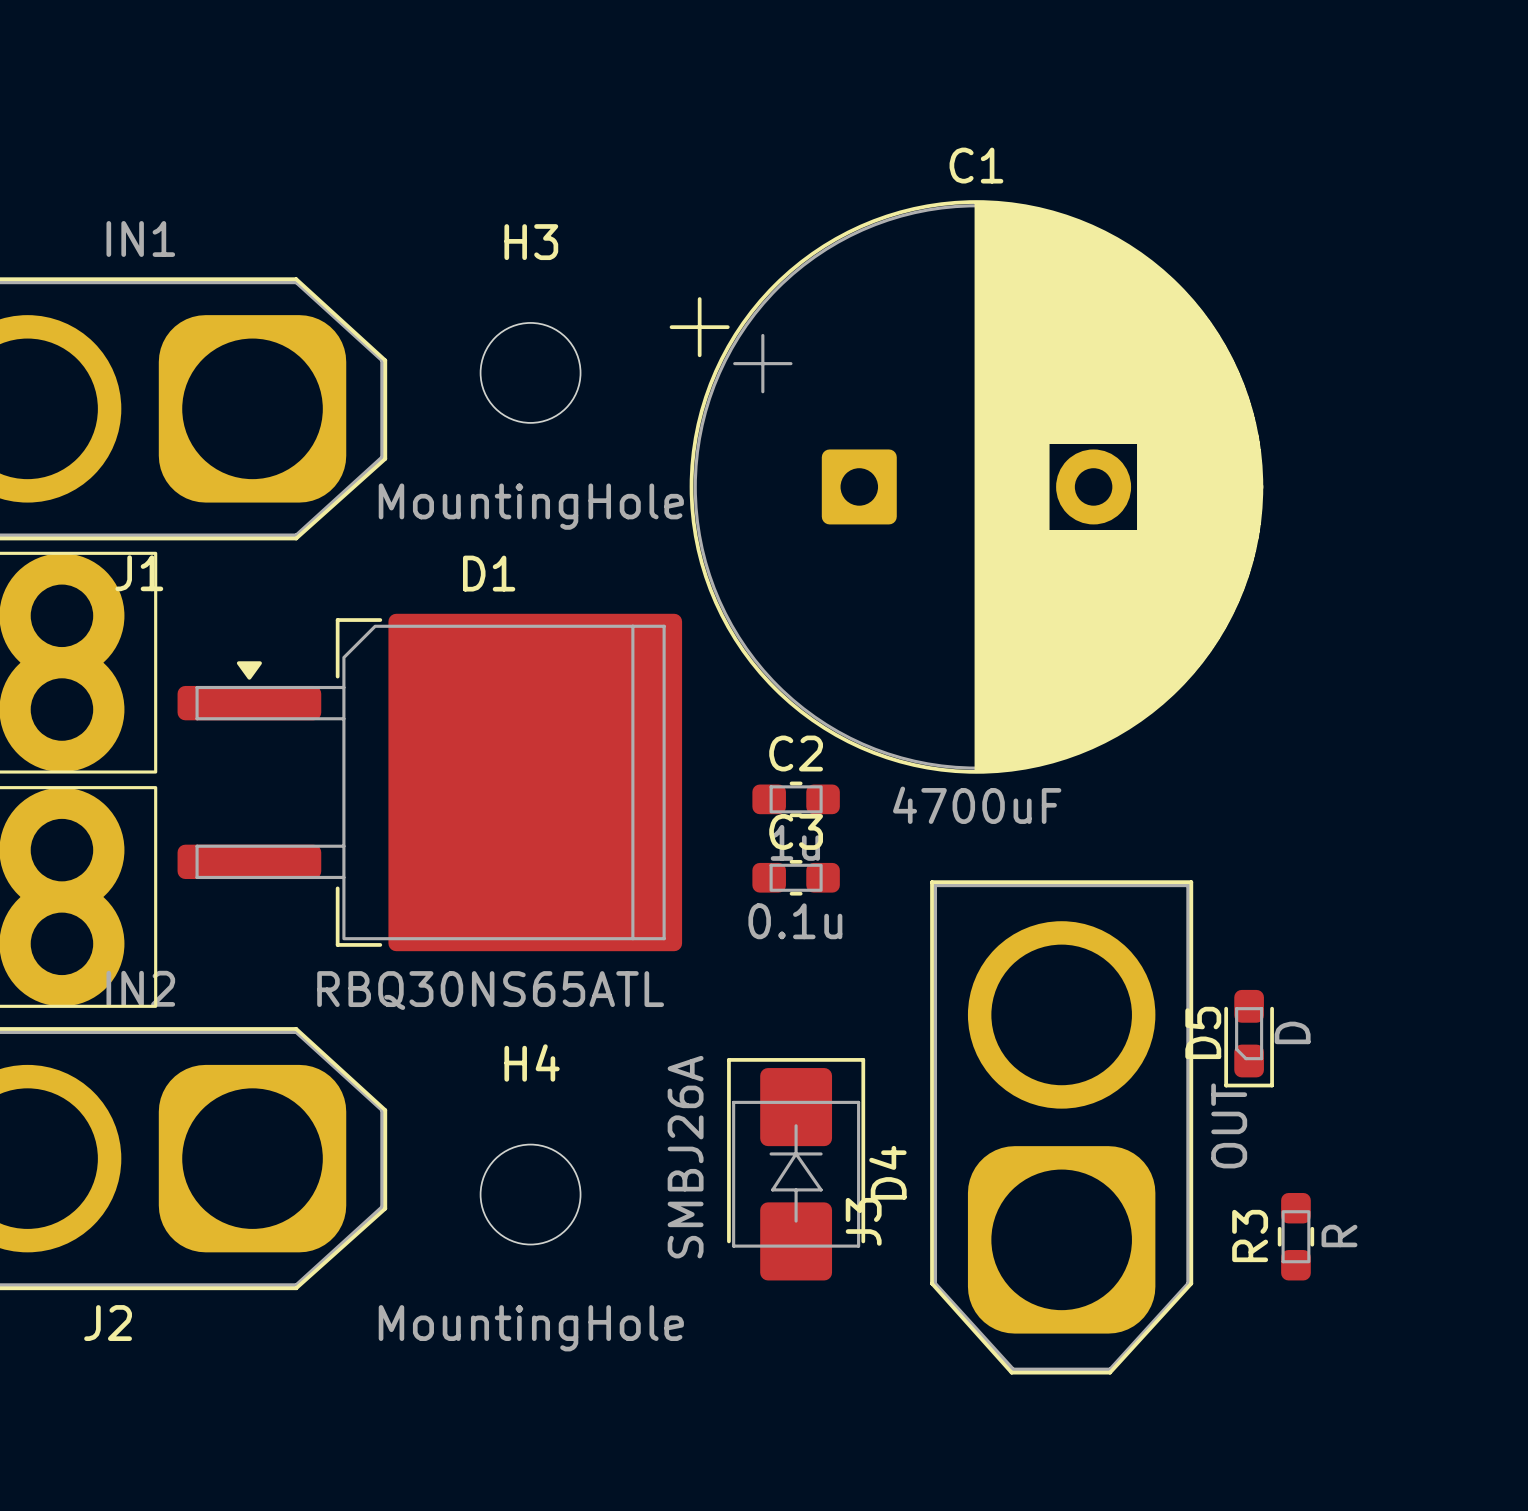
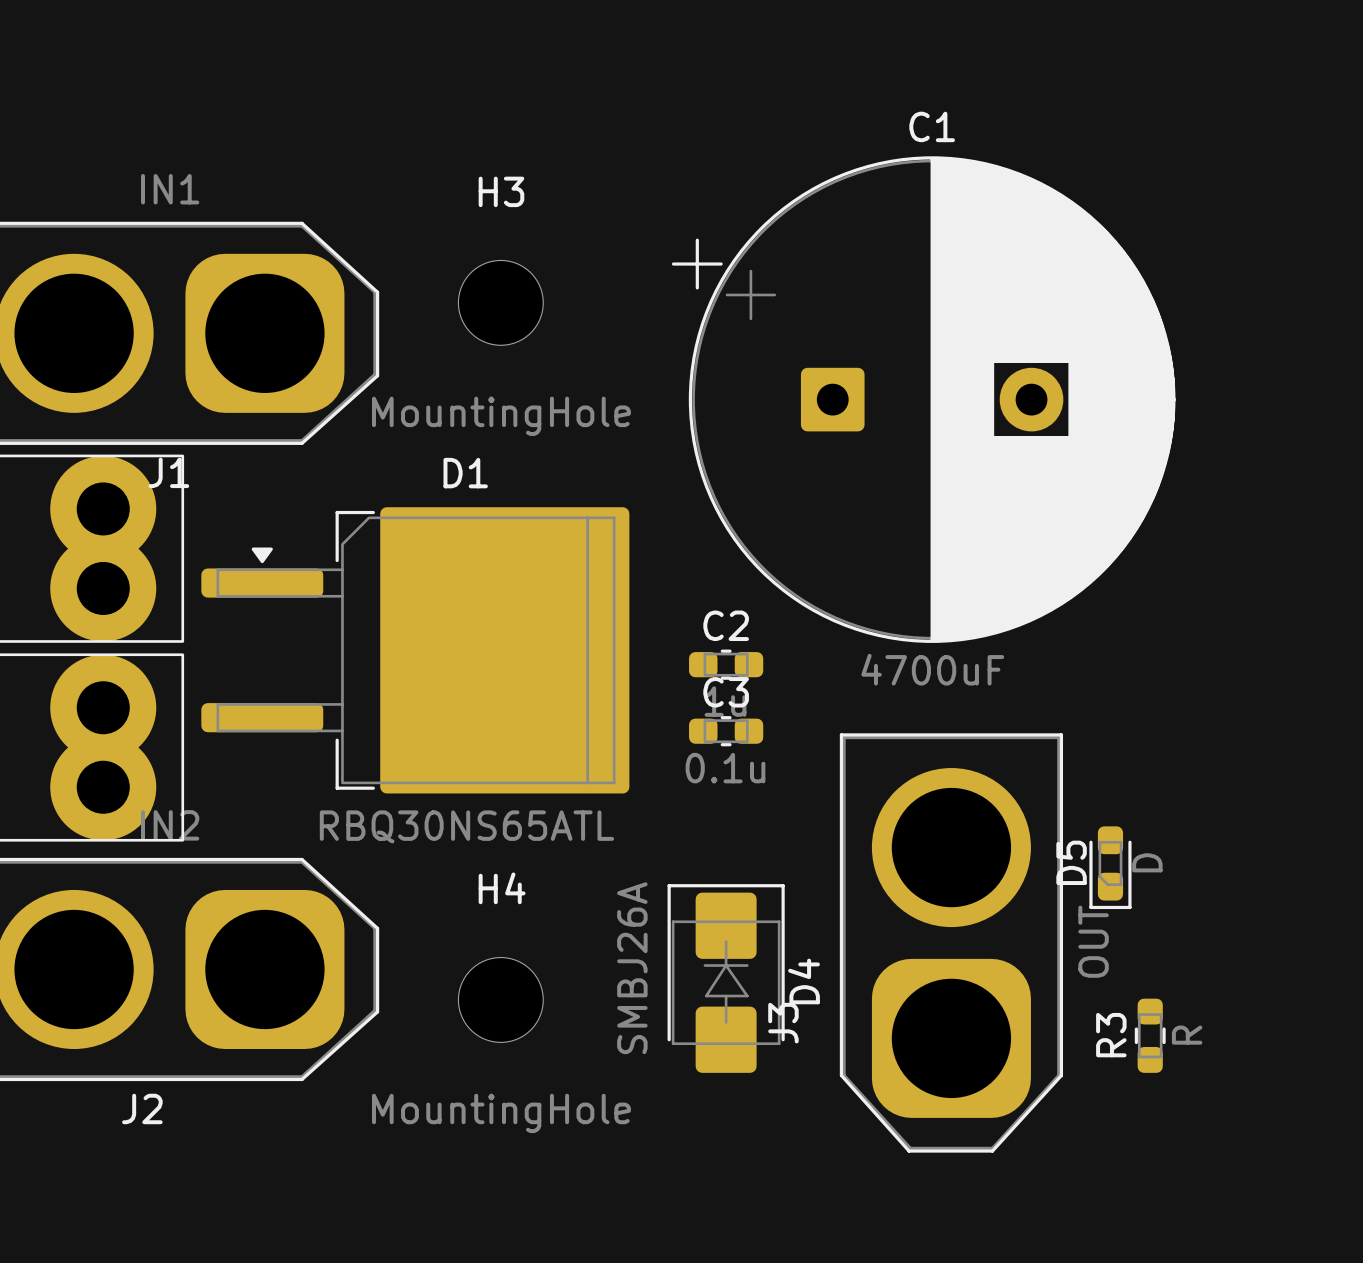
C1 position: (966, 486) -> (923, 399)

